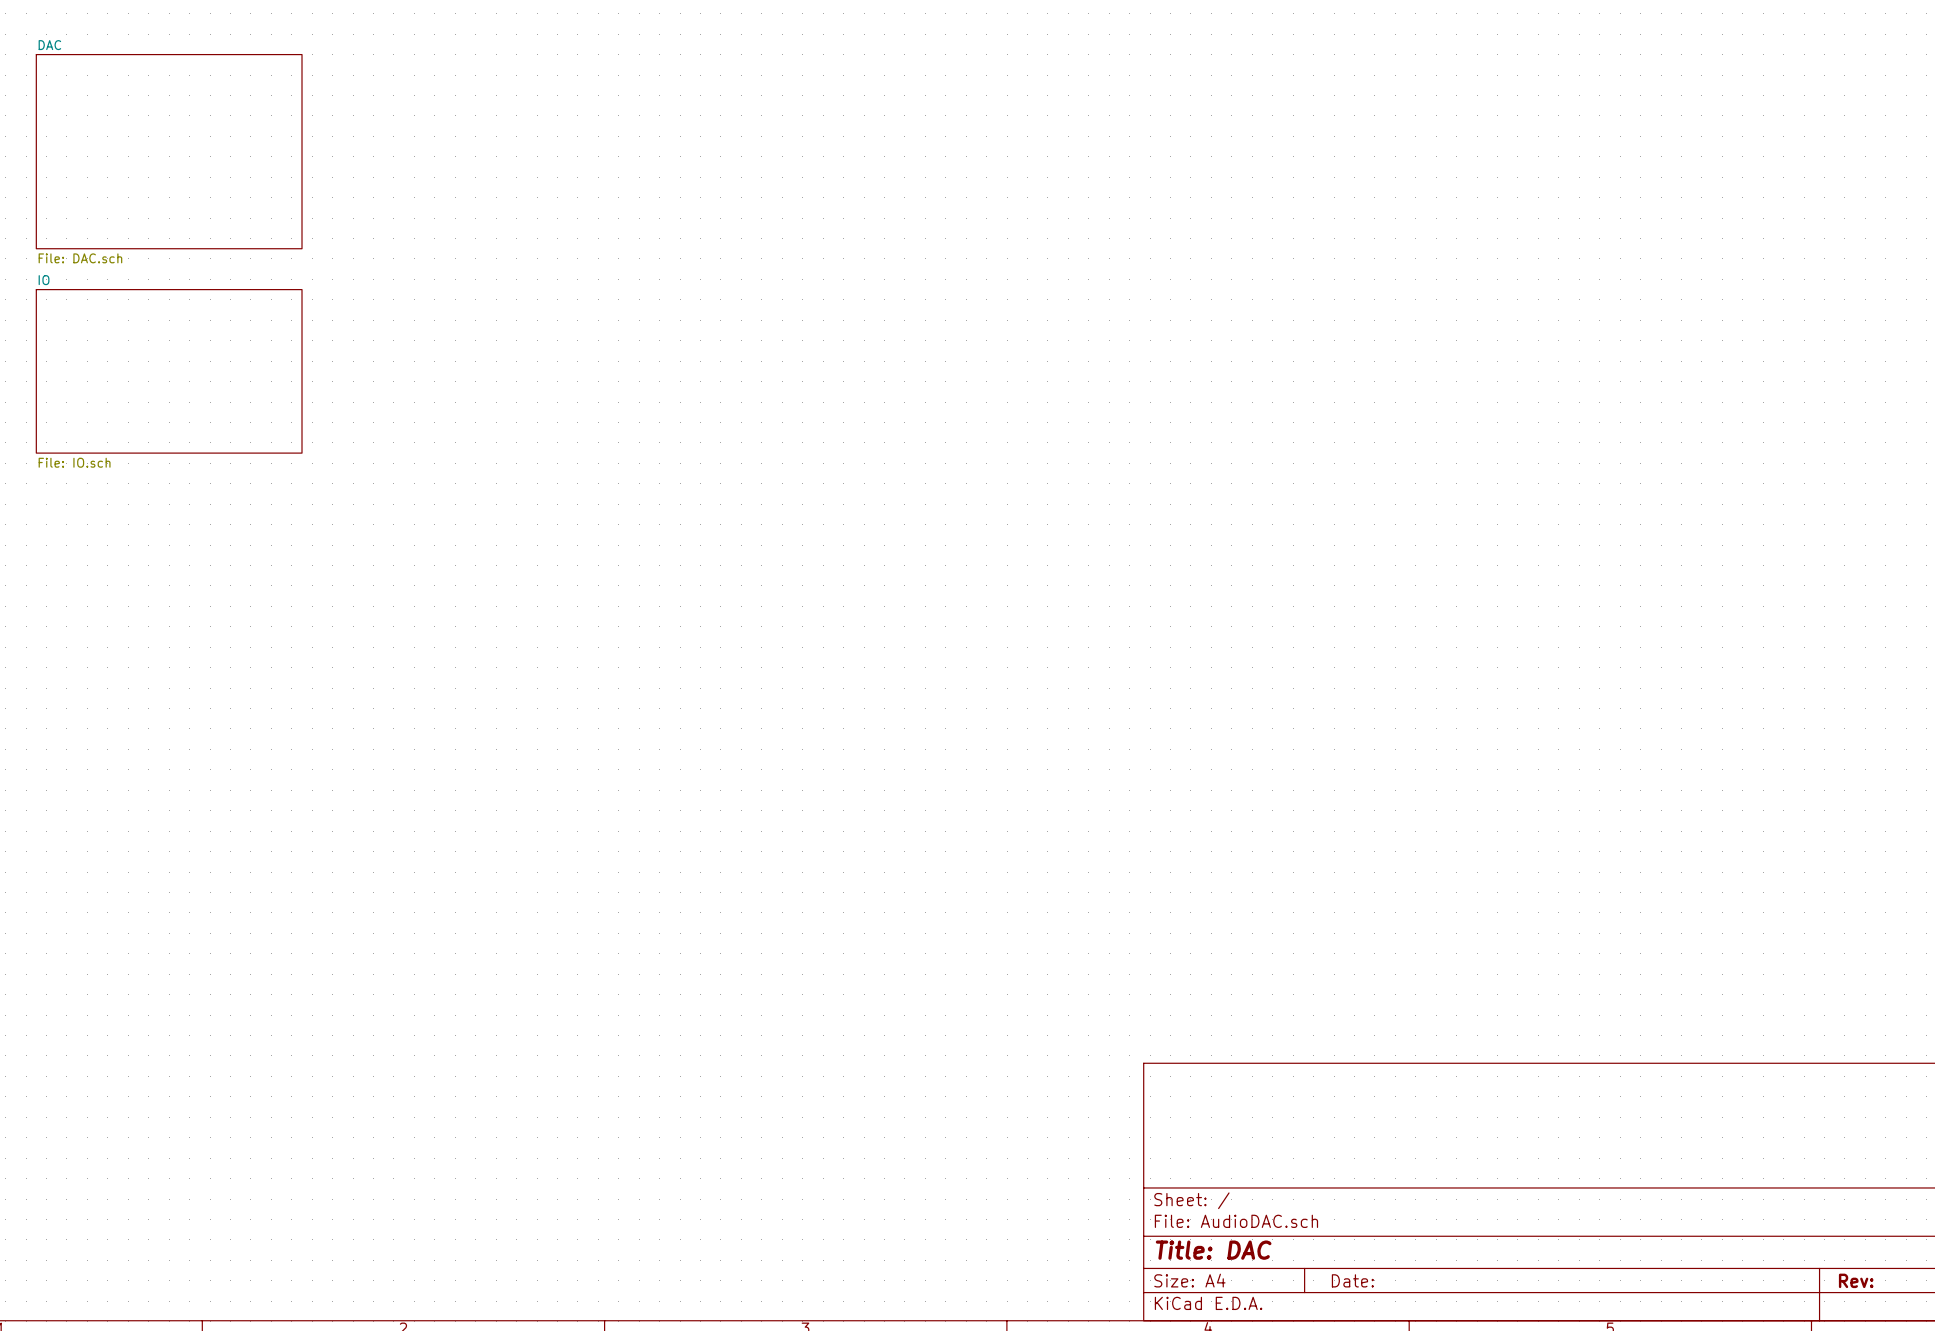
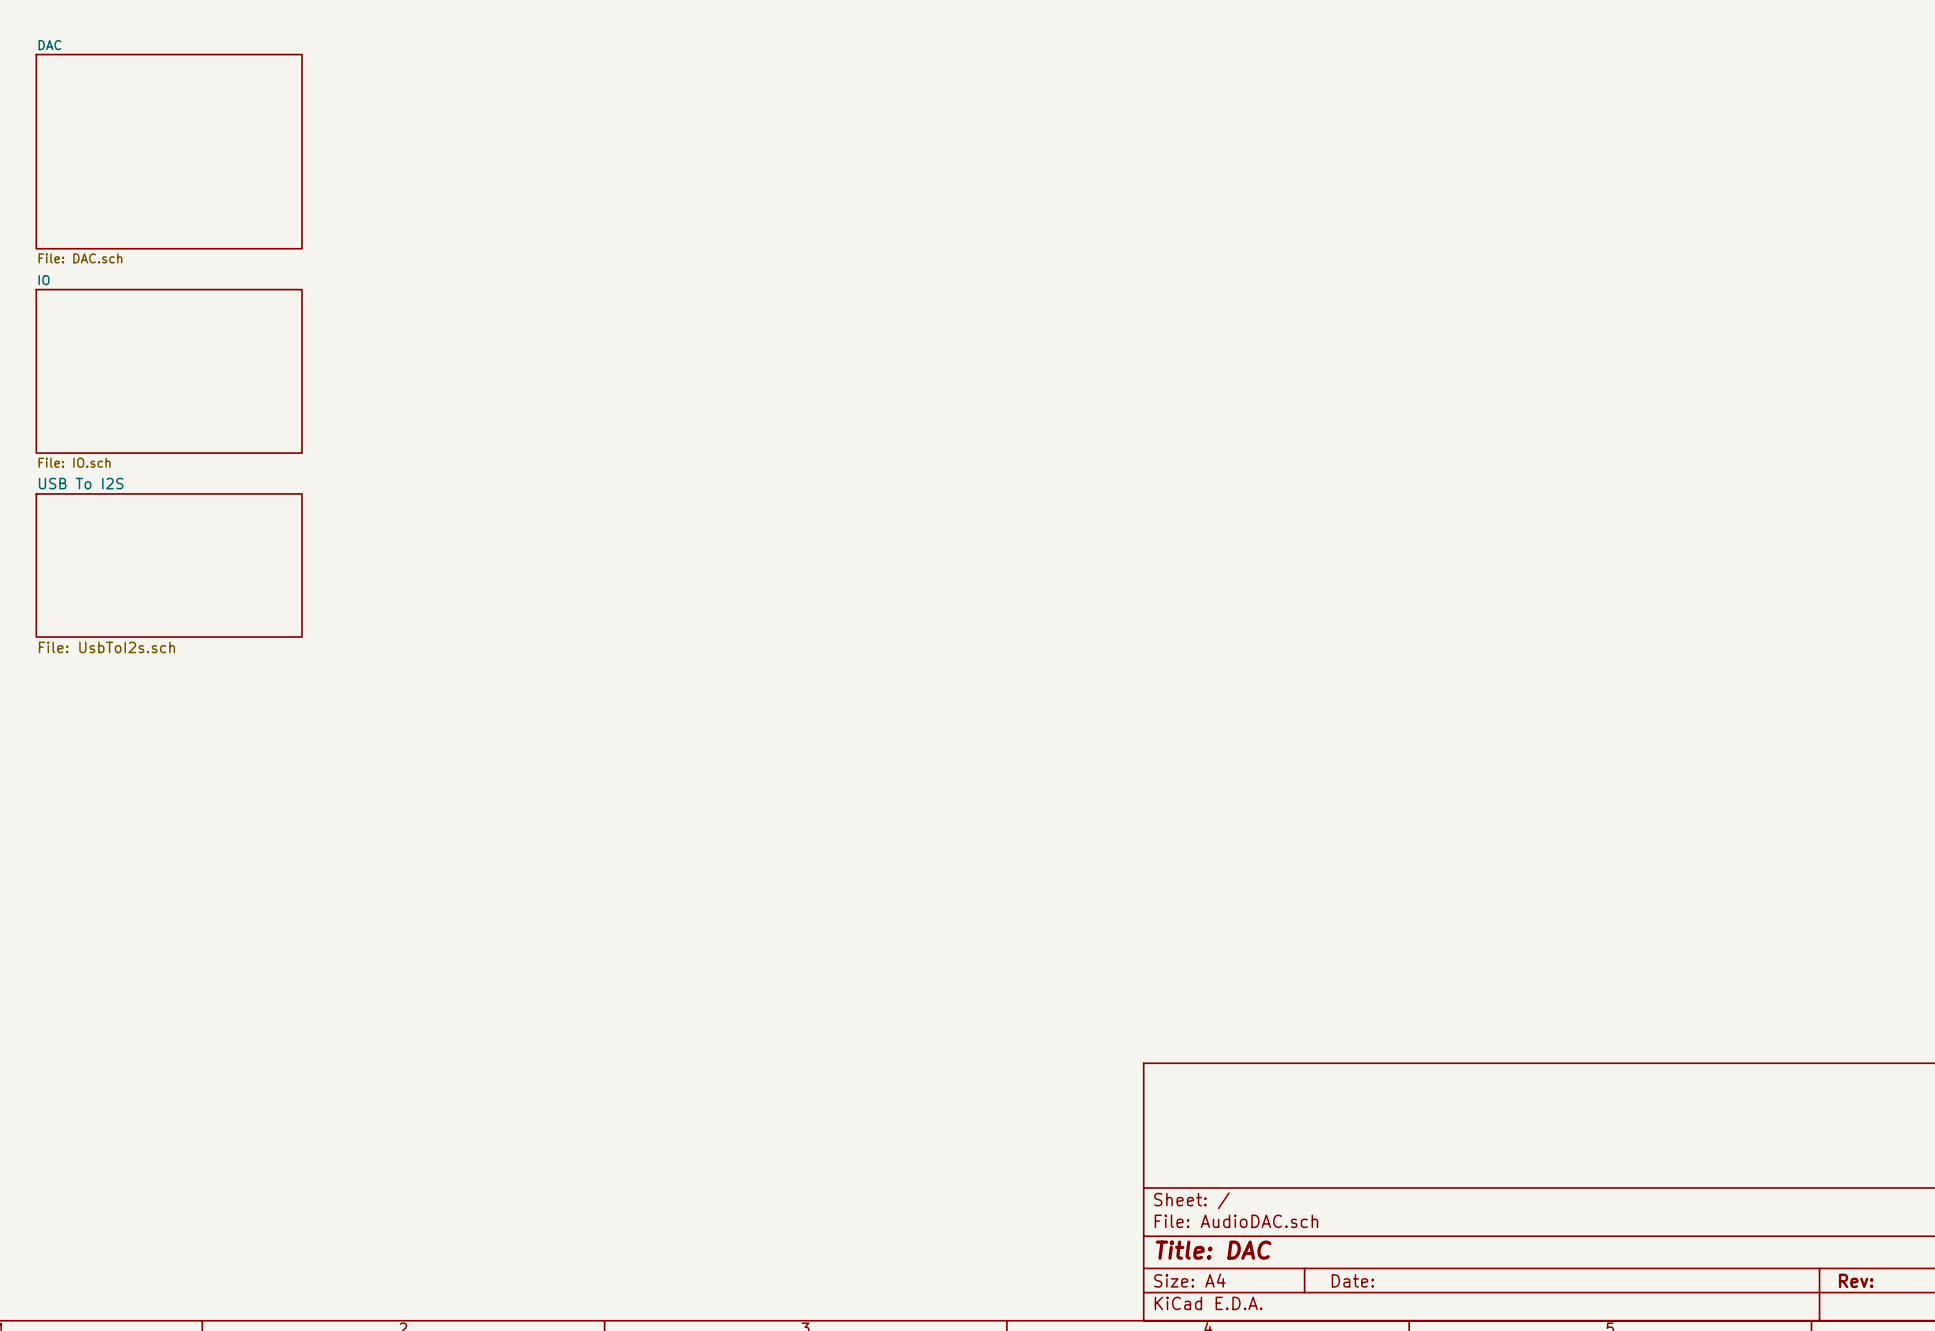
sheet USB To I2S: none -> File: UsbToI2s.sch (169, 565)

